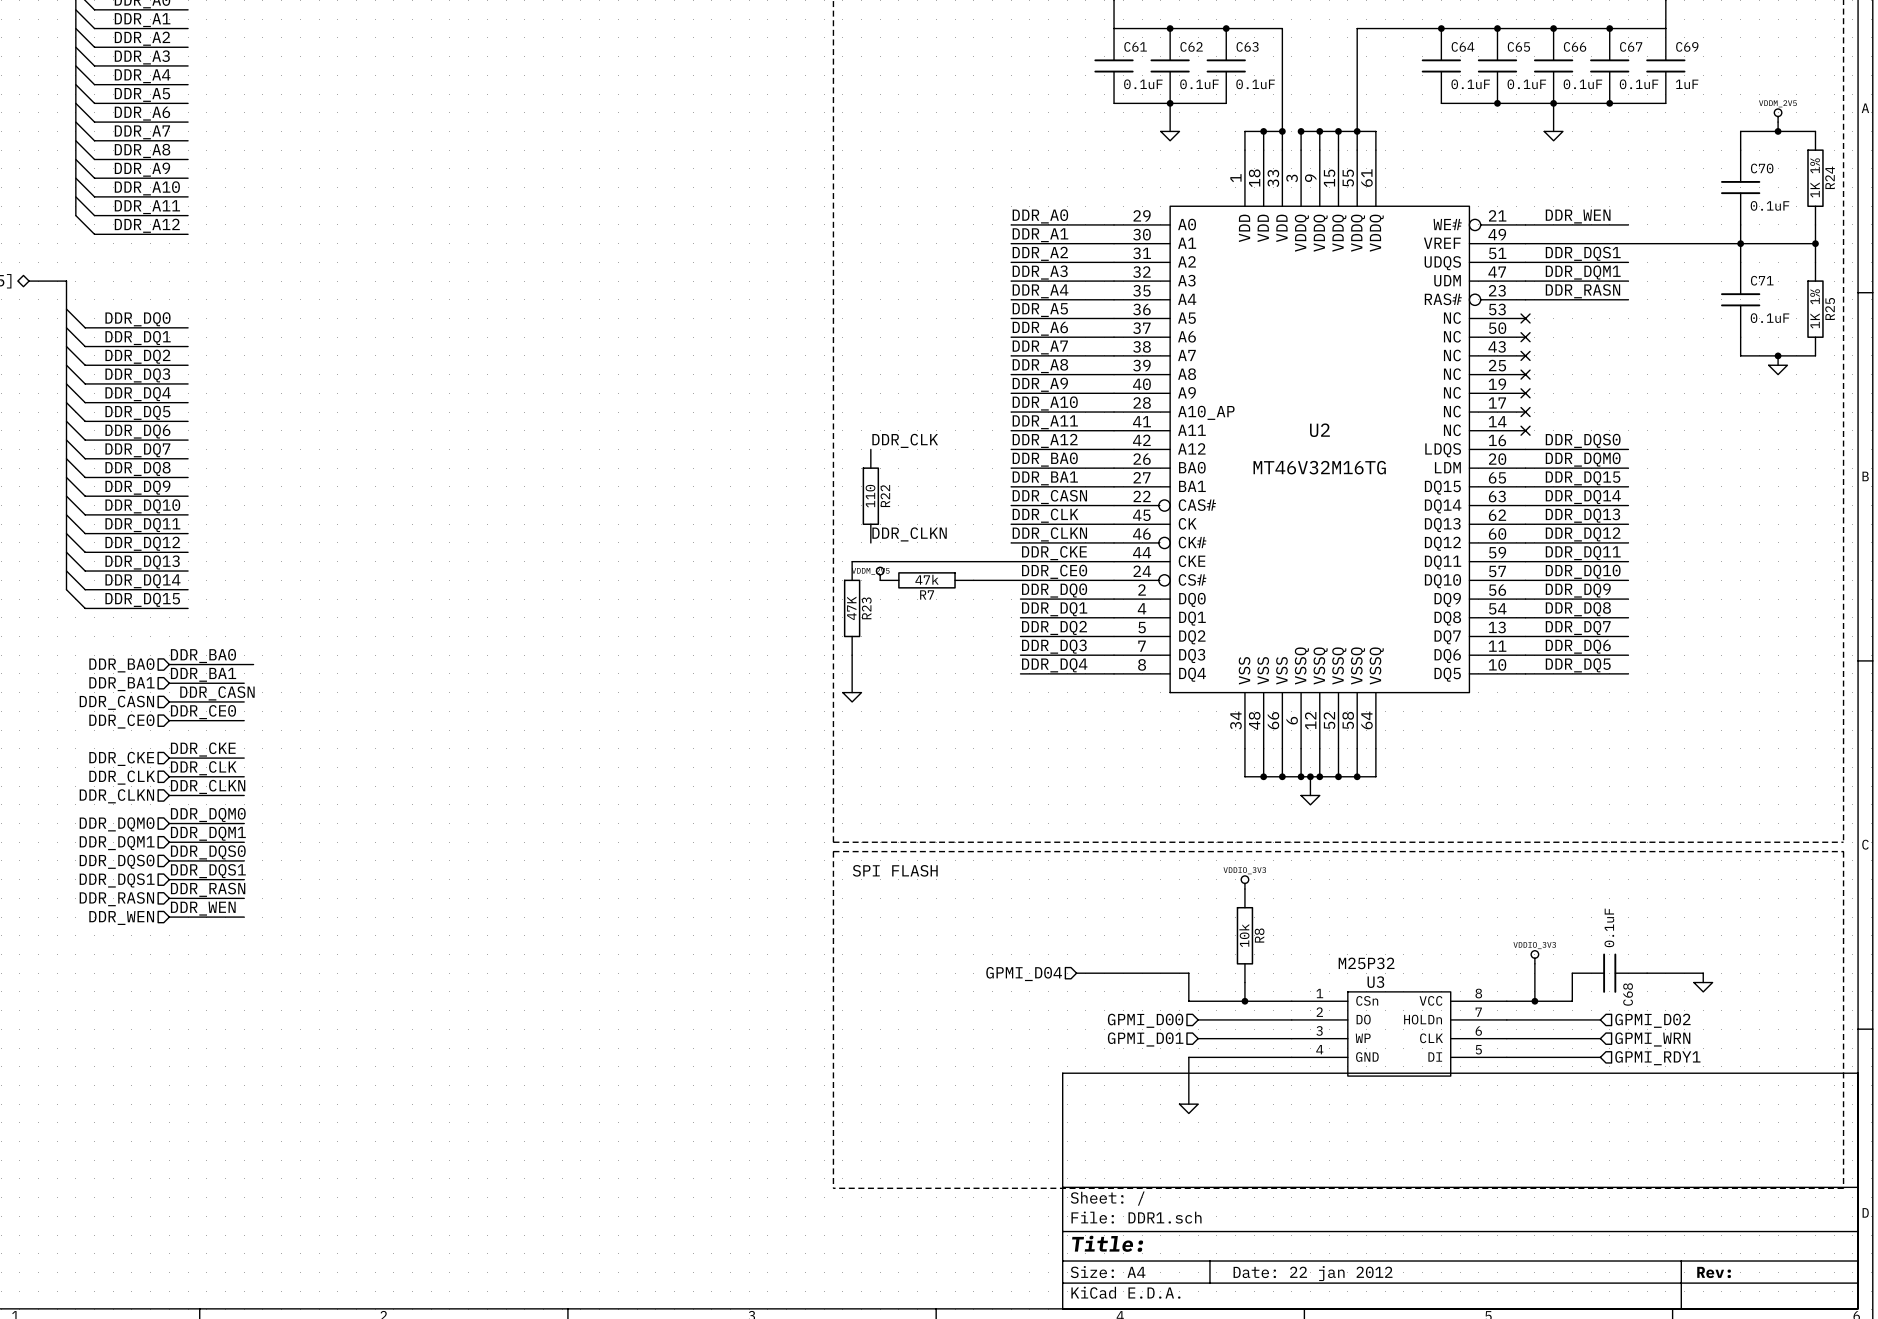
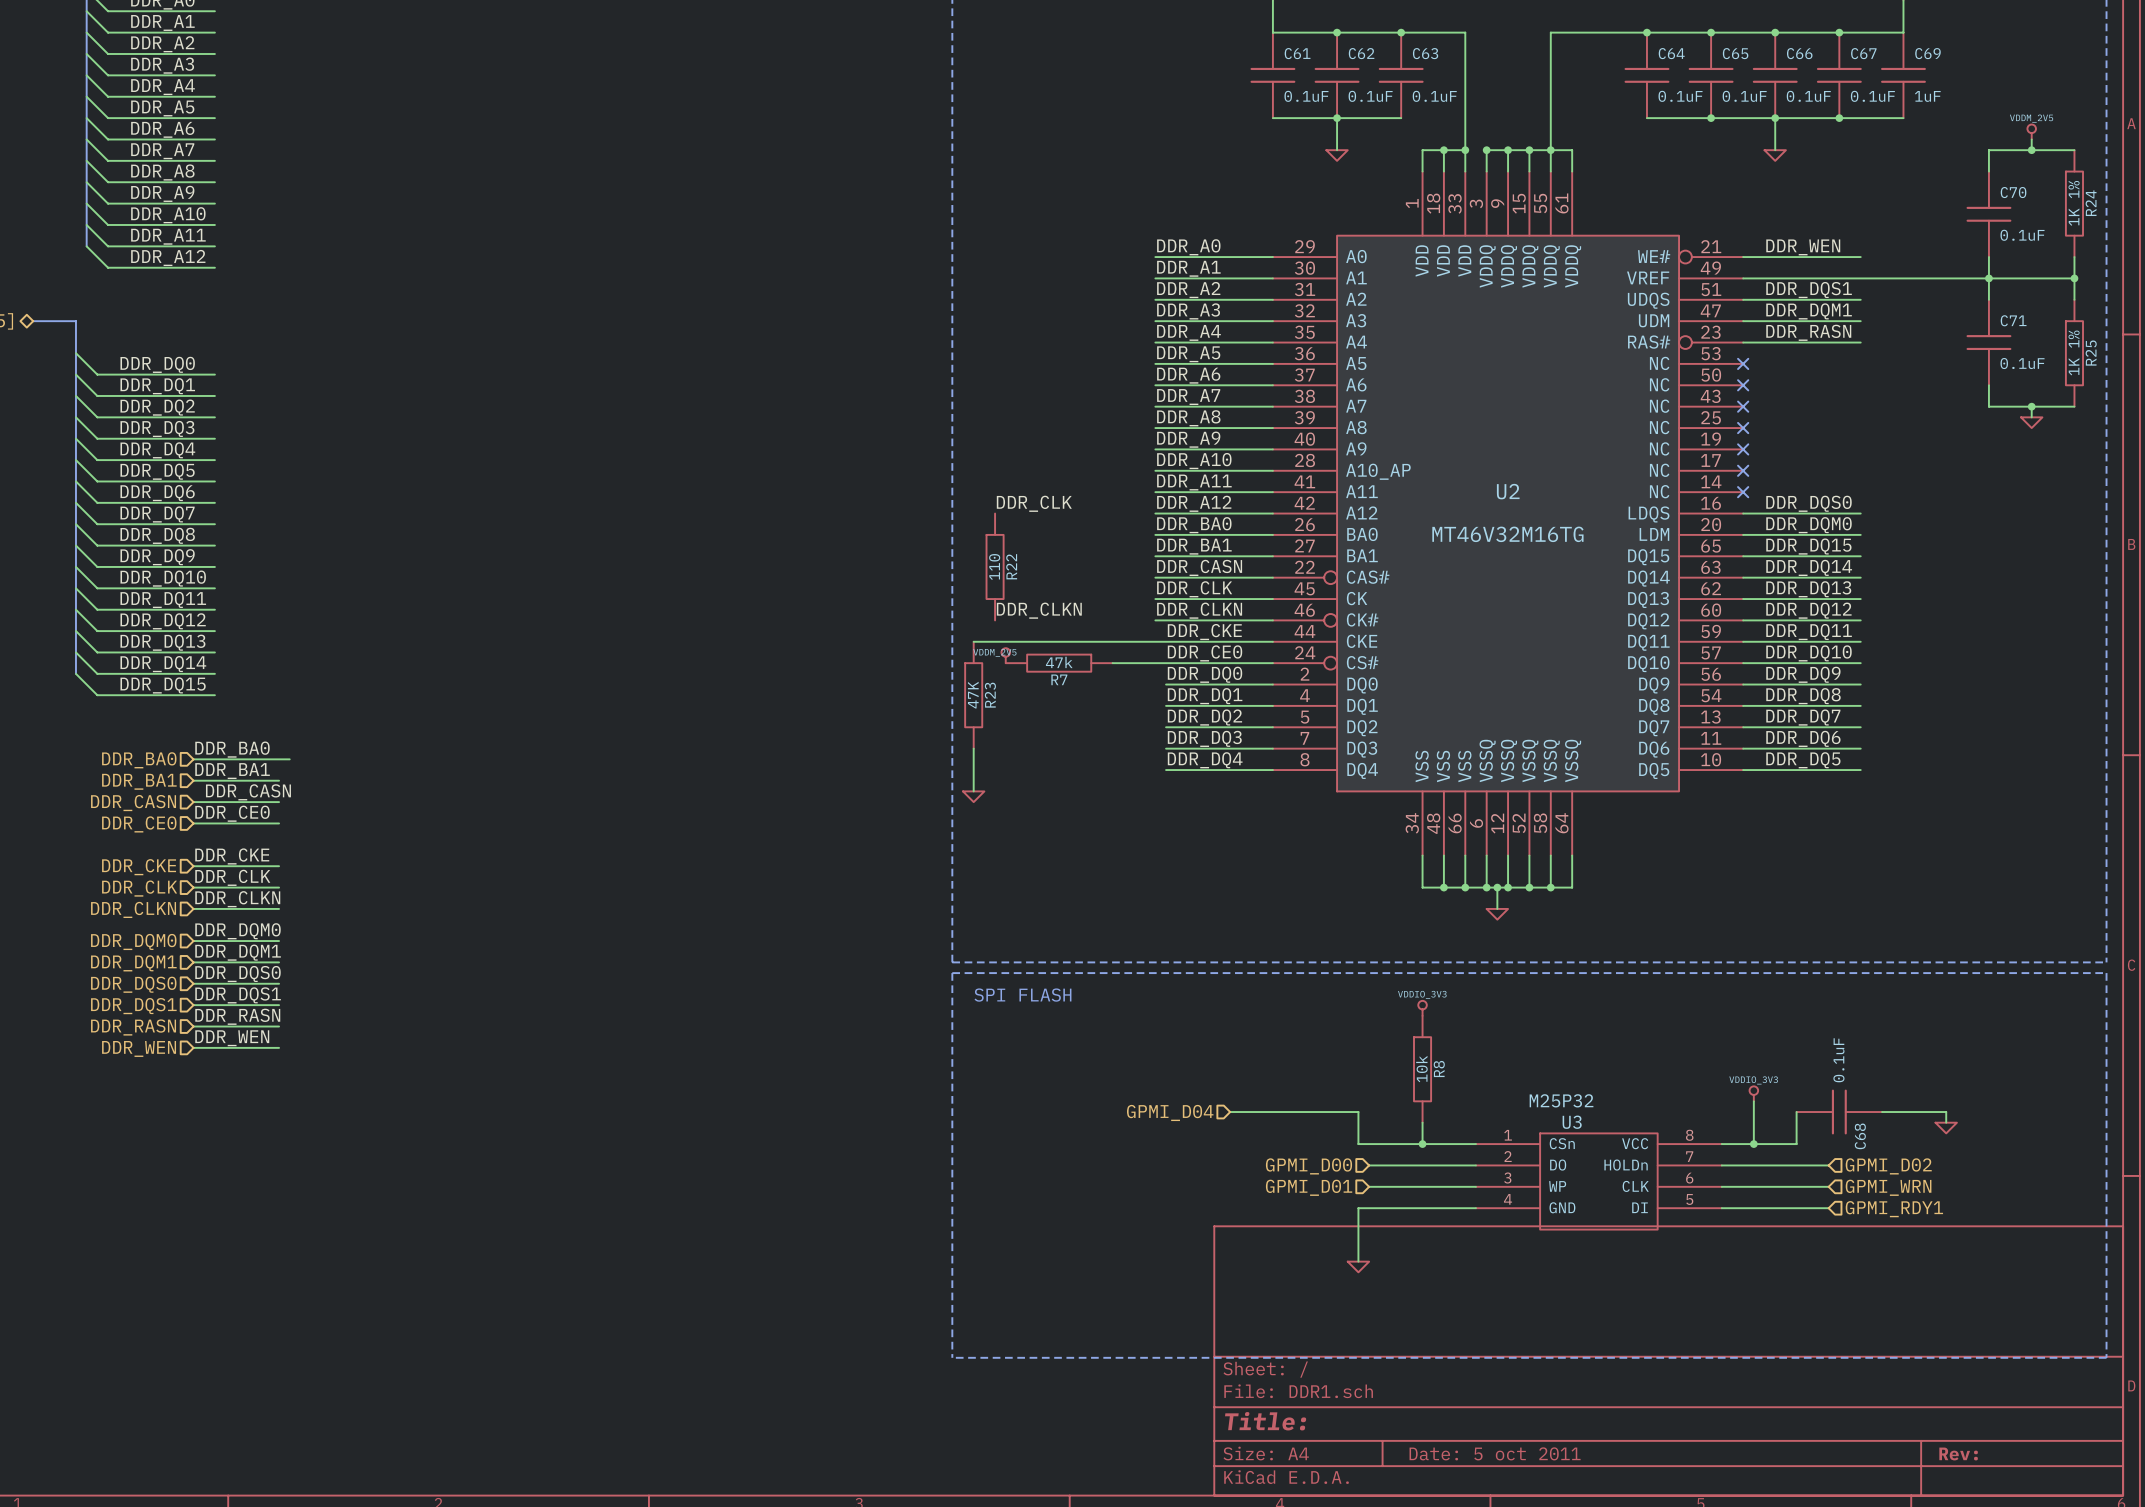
title block: Date: 22 jan 2012 (1313, 1273) -> Date: 5 oct 2011 (1495, 1453)

